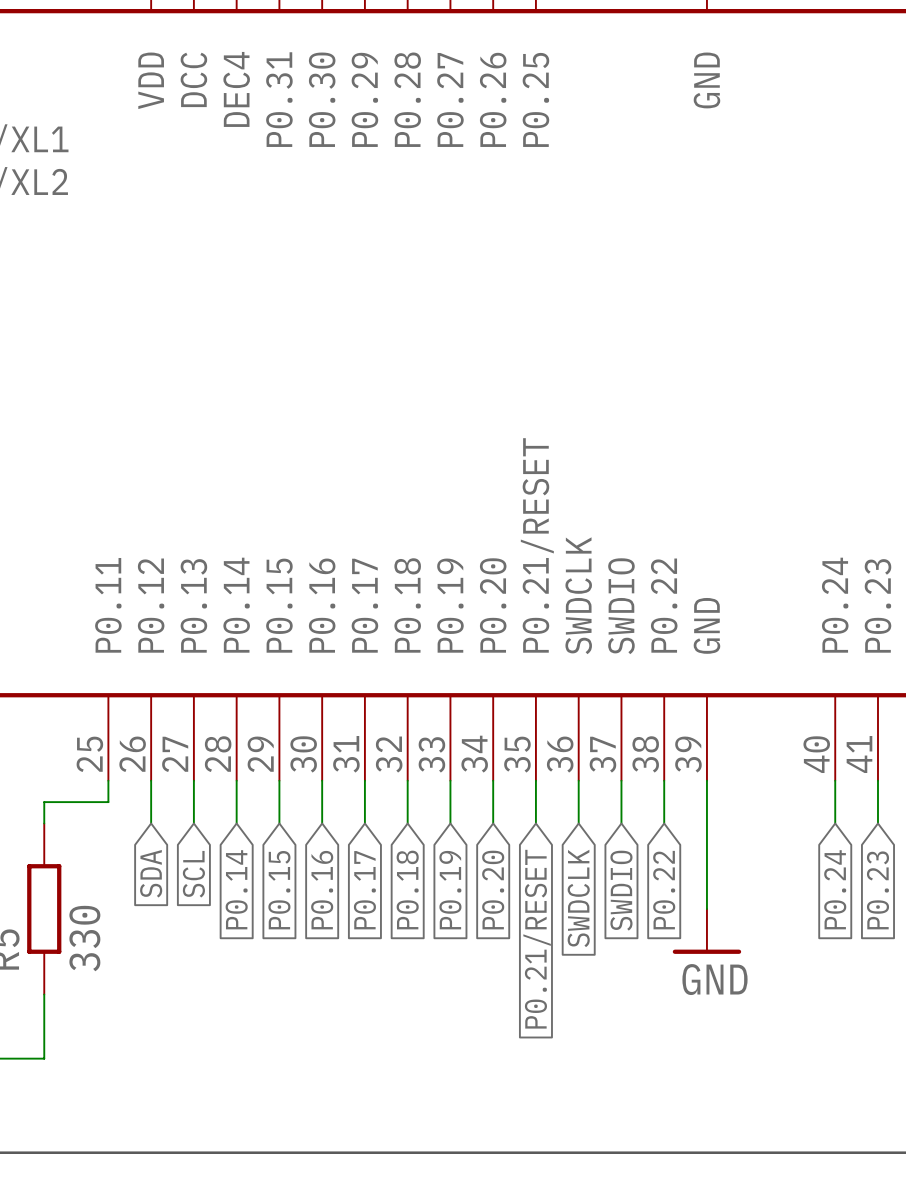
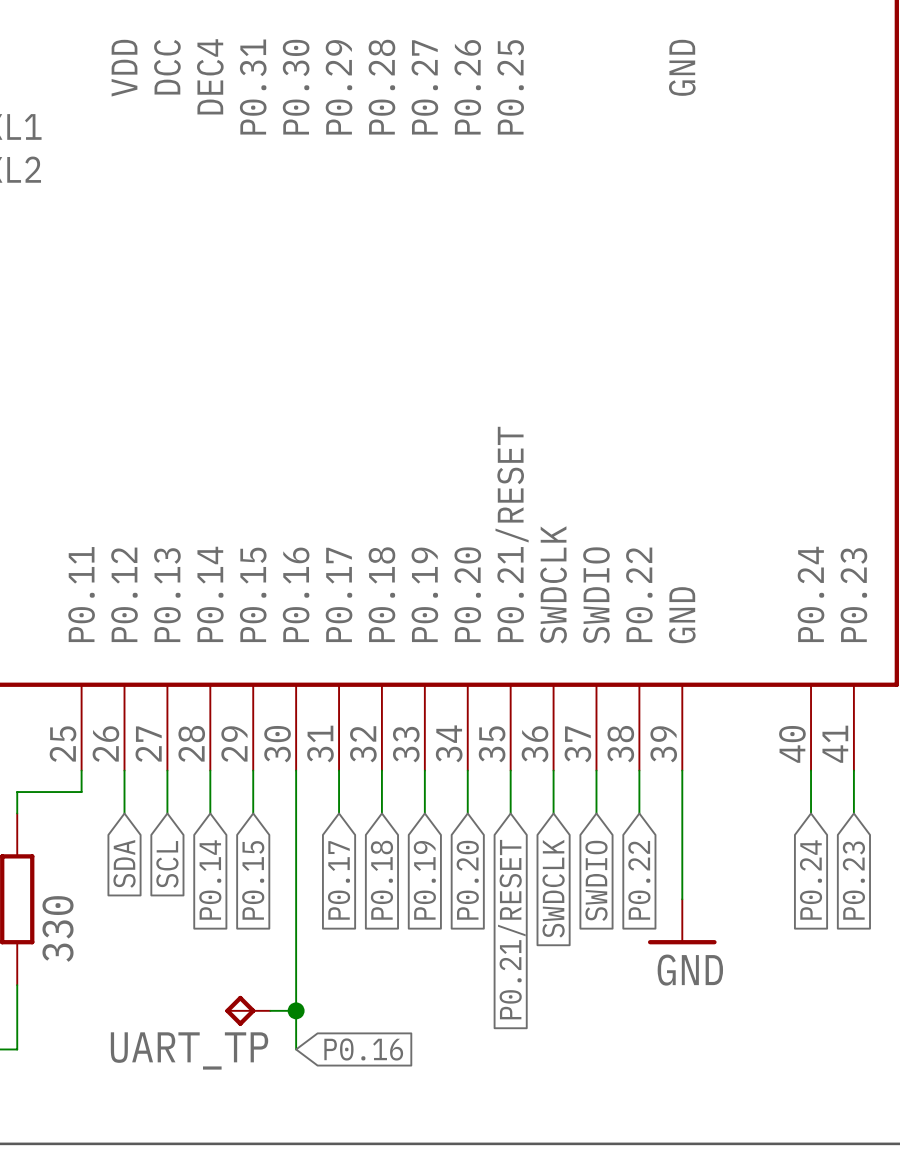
wire: none -> (296, 813) (296, 1049)
global label rotation: 0° (322, 890) -> 90° counterclockwise (363, 1049)
global label position: P0.16 (322, 890) -> P0.16 (363, 1049)
UART_TP: none -> (247, 1010)
wire: none -> (270, 1010) (296, 1010)
junction: none -> (296, 1010)

